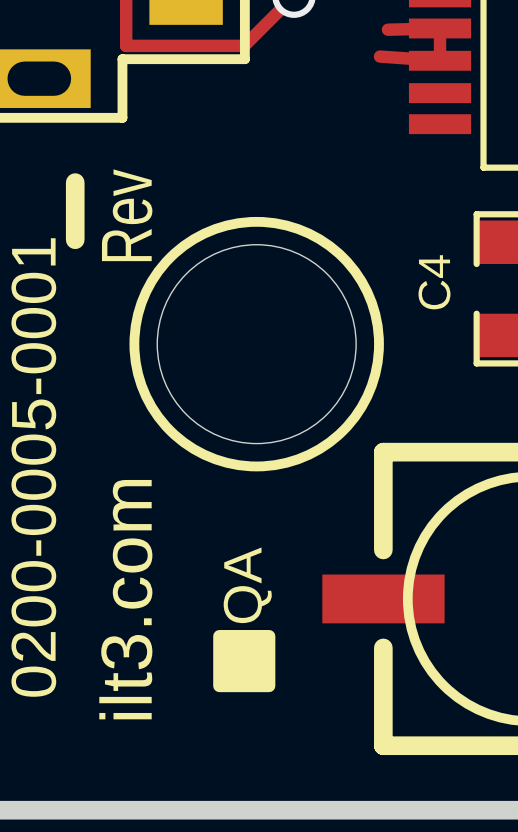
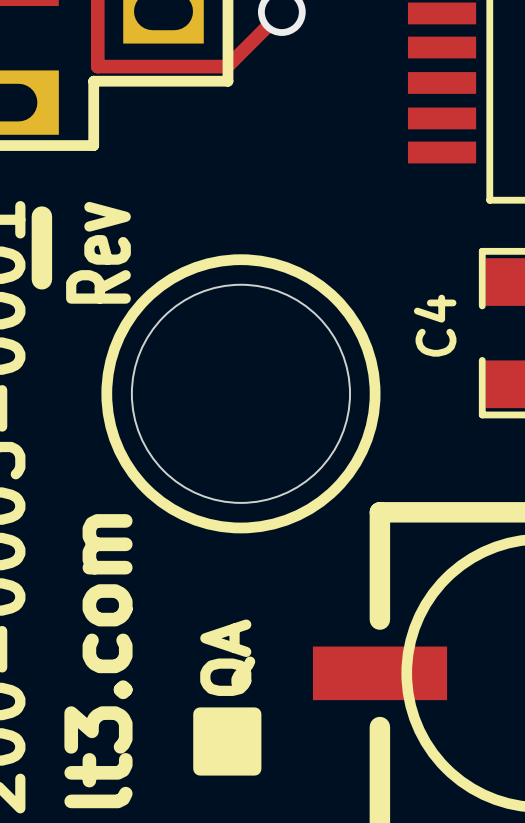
top track: (387, 29) (440, 28) (440, 60) (379, 56) -> none

